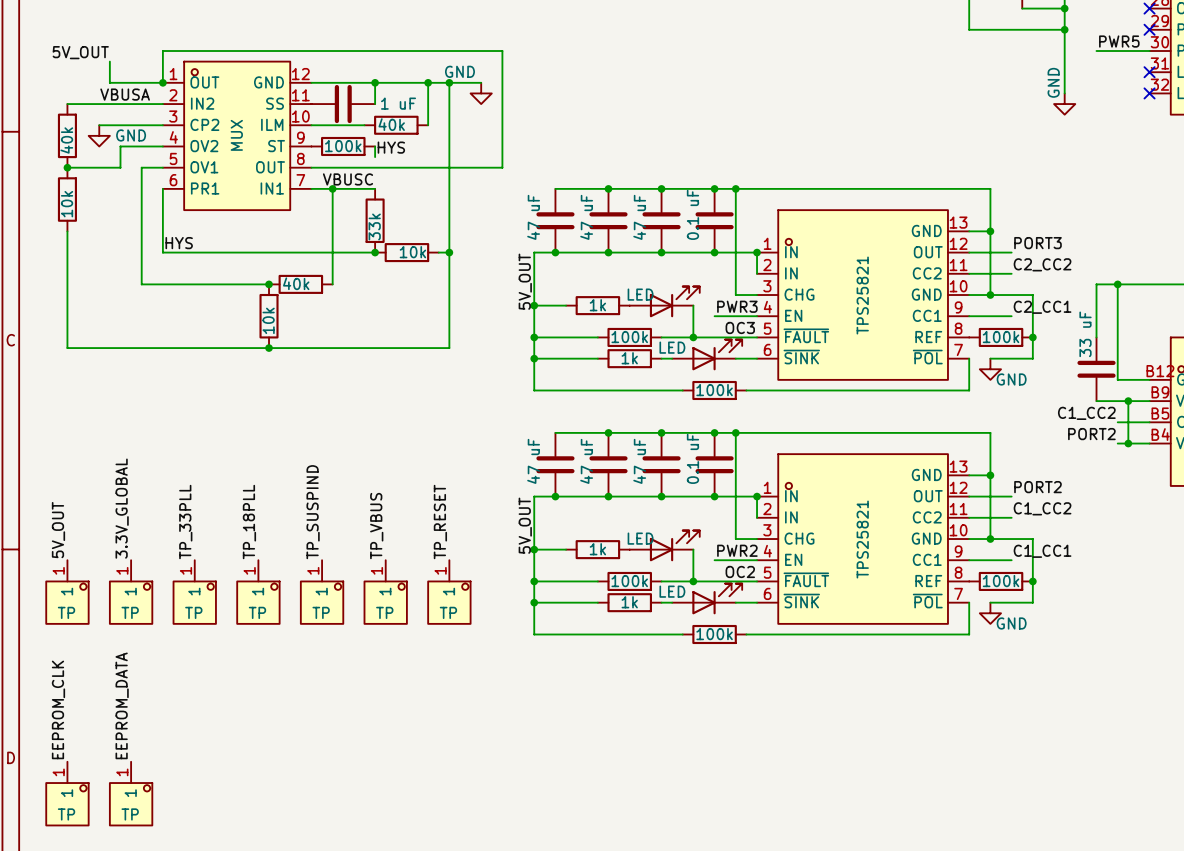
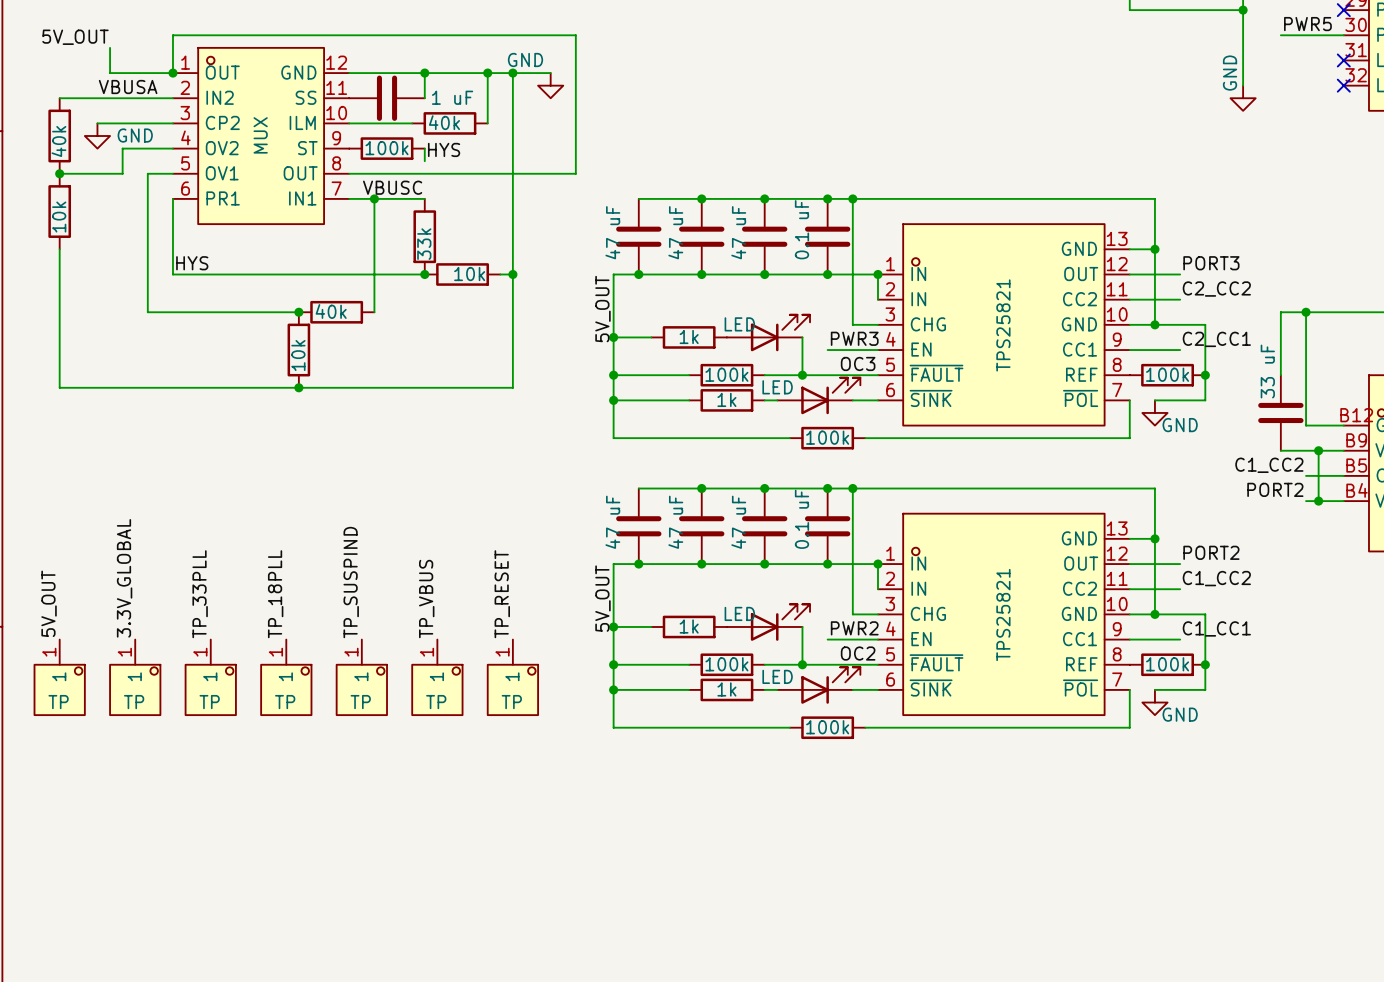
label: EEPROM_DATA (122, 705) -> none
label: EEPROM_CLK (58, 709) -> none
part: TP (67, 793) -> none
part: TP (131, 793) -> none

